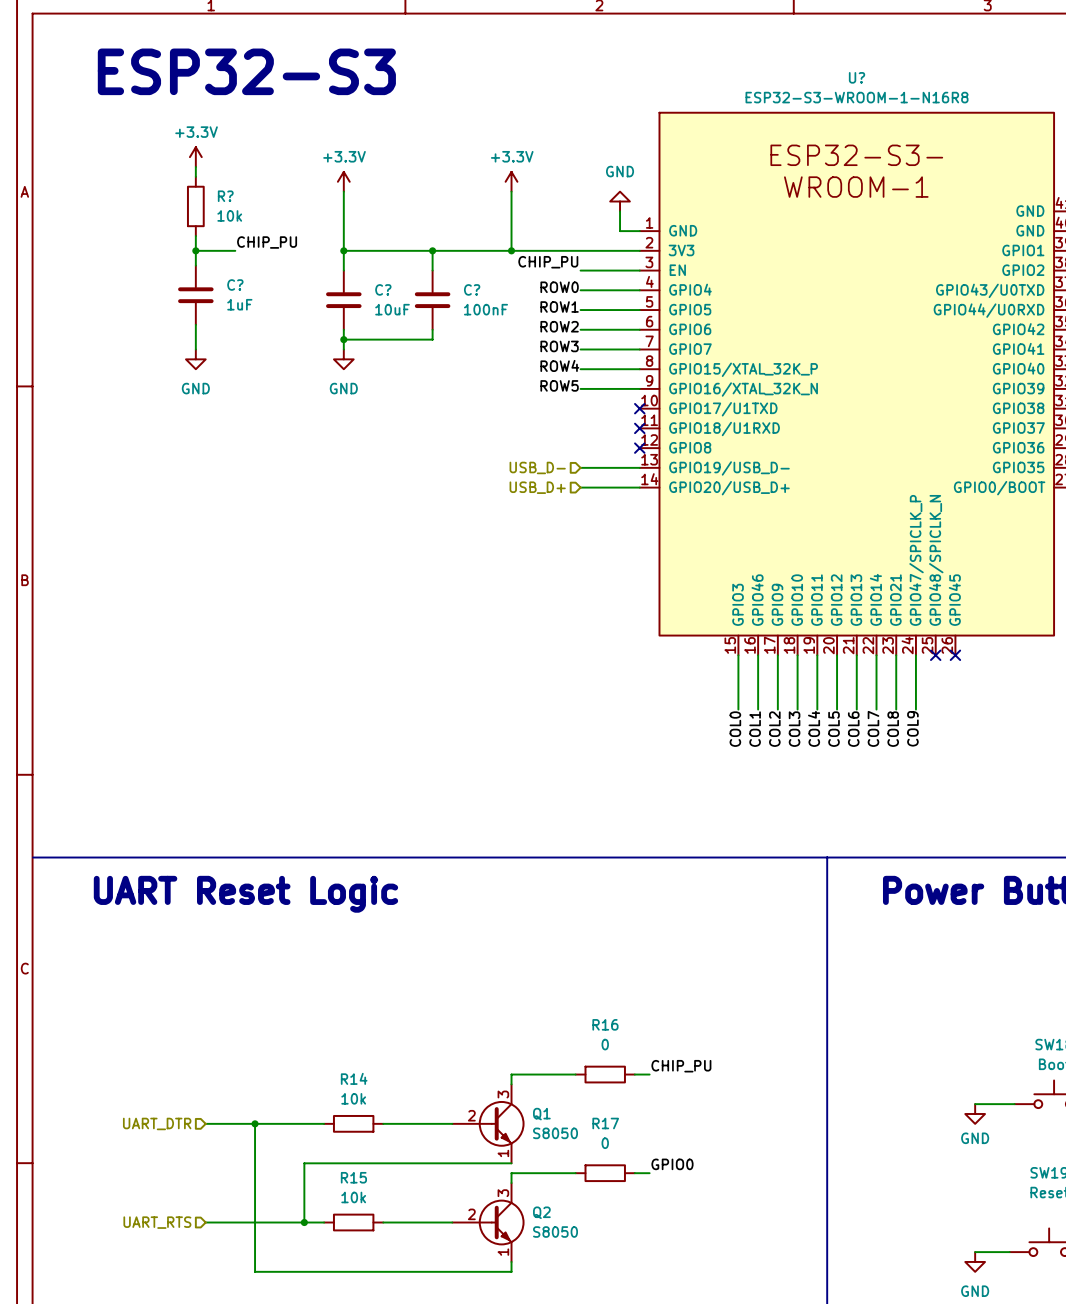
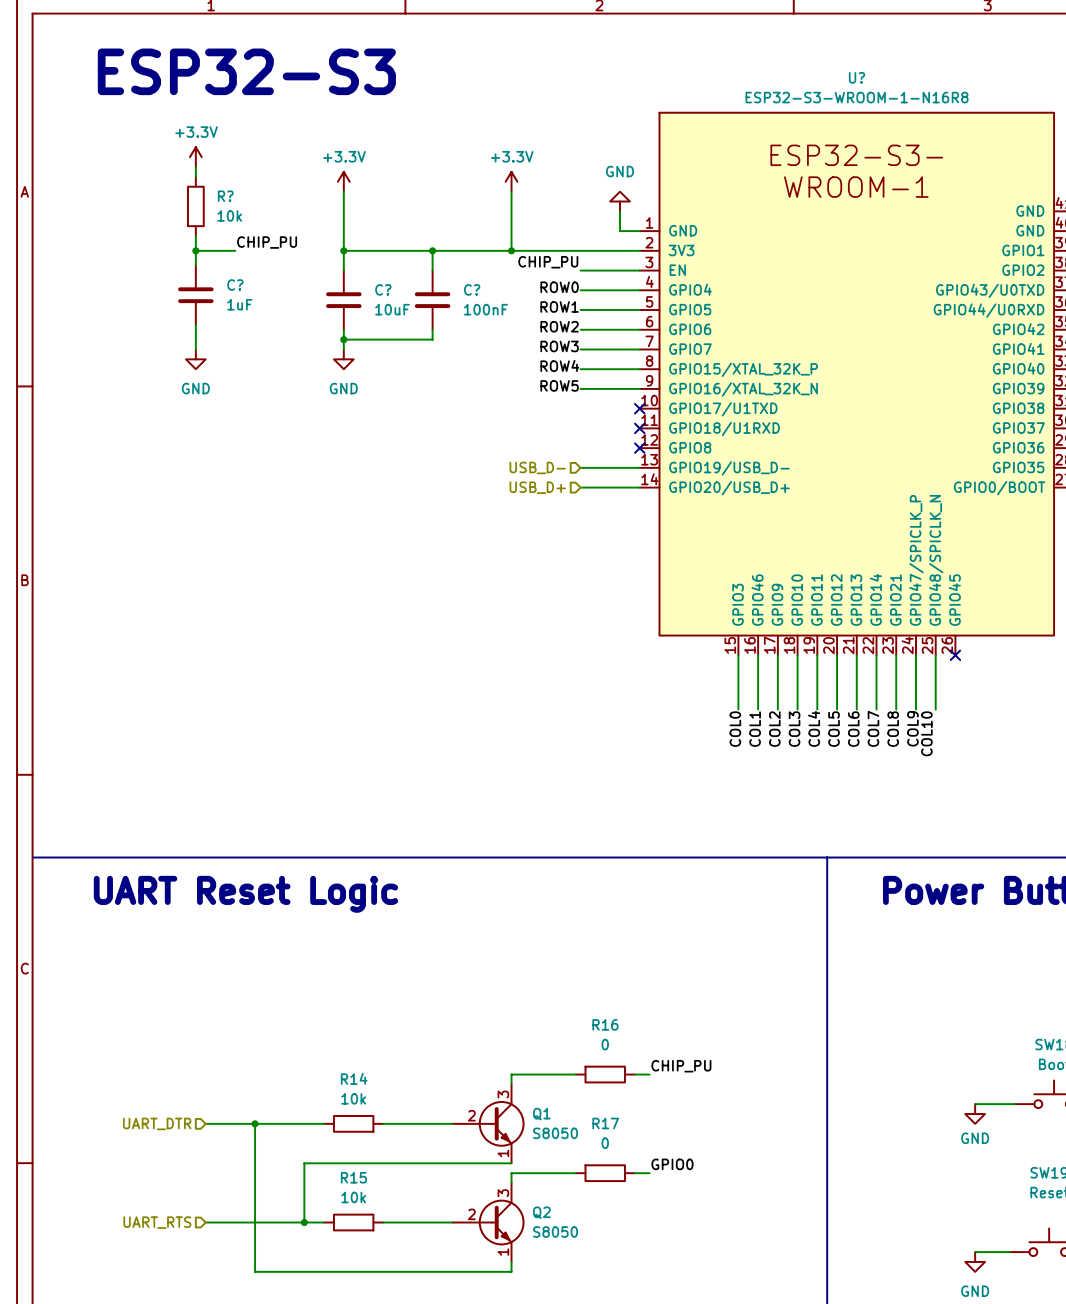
wire: none -> (935, 655) (935, 709)
no-connect mark: (935, 655) -> none
label: none -> COL10 (926, 733)

